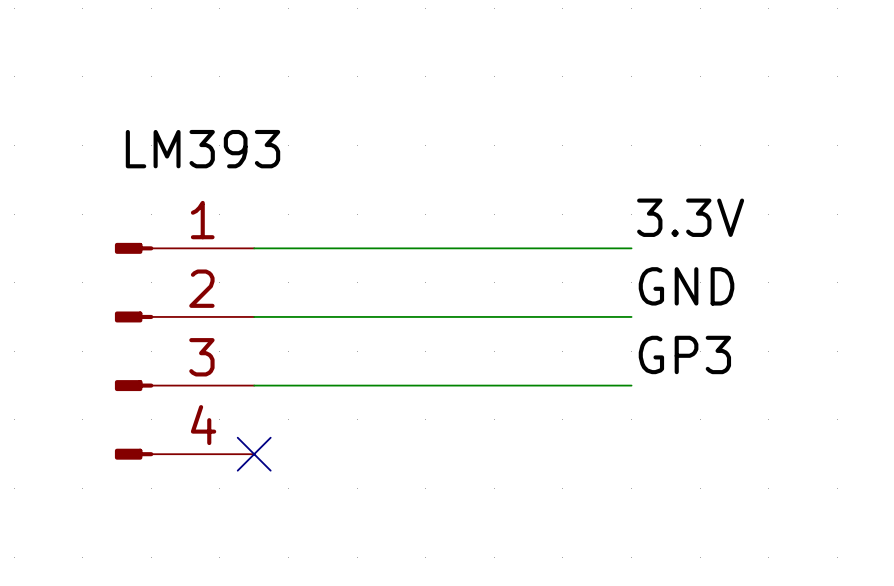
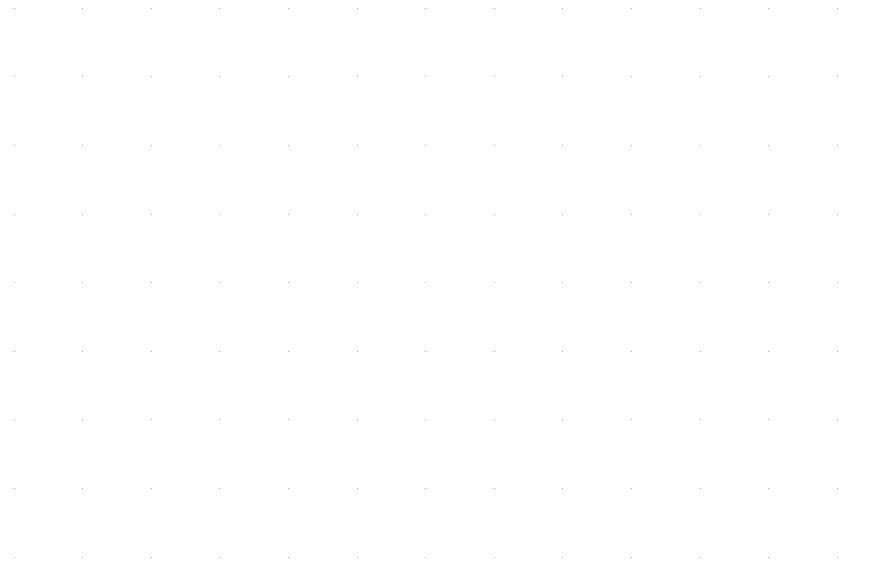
label: LM393 (202, 149) -> none
label: 3.3V (690, 217) -> none
wire: (254, 248) (631, 248) -> none
label: GND (686, 286) -> none
wire: (254, 316) (631, 316) -> none
part: (184, 351) -> none
label: GP3 (684, 354) -> none
wire: (254, 385) (631, 385) -> none
no-connect mark: (254, 454) -> none

